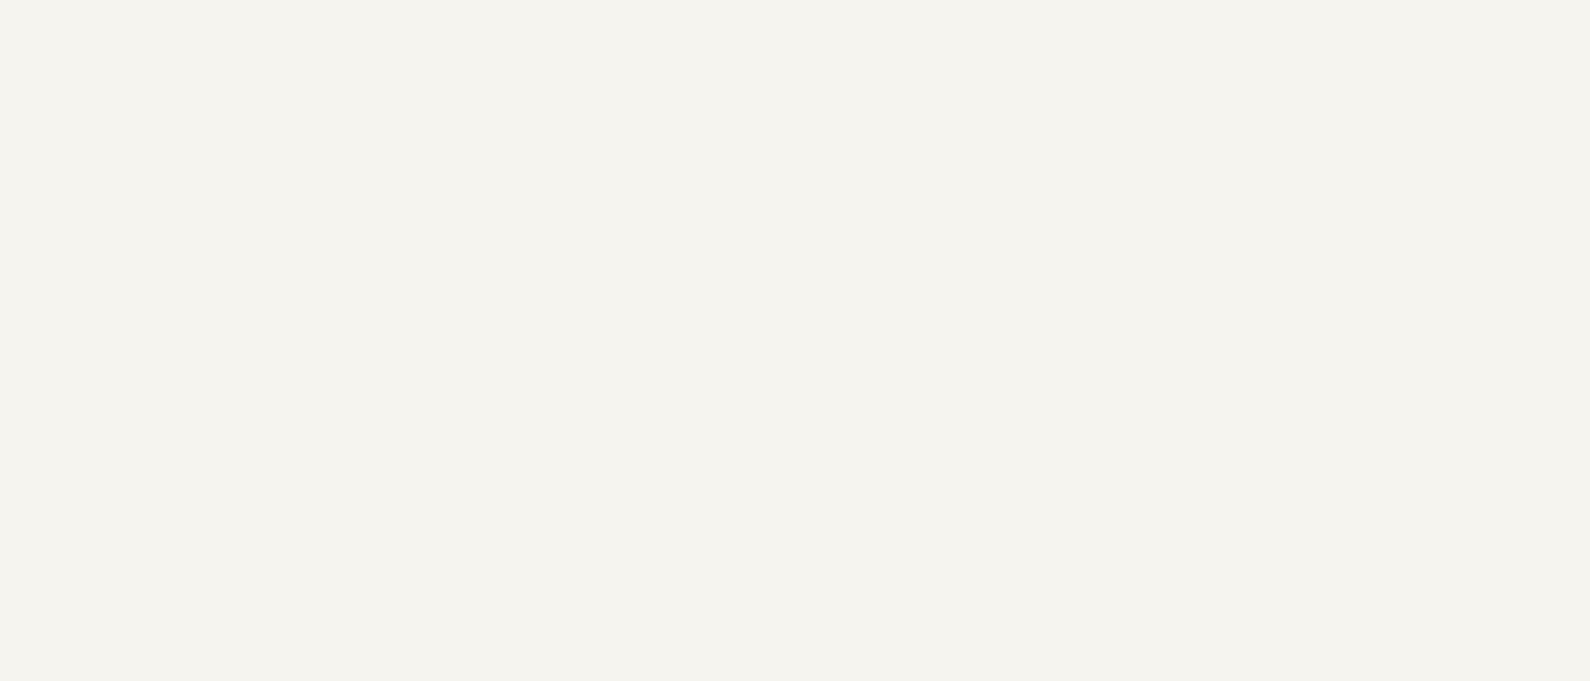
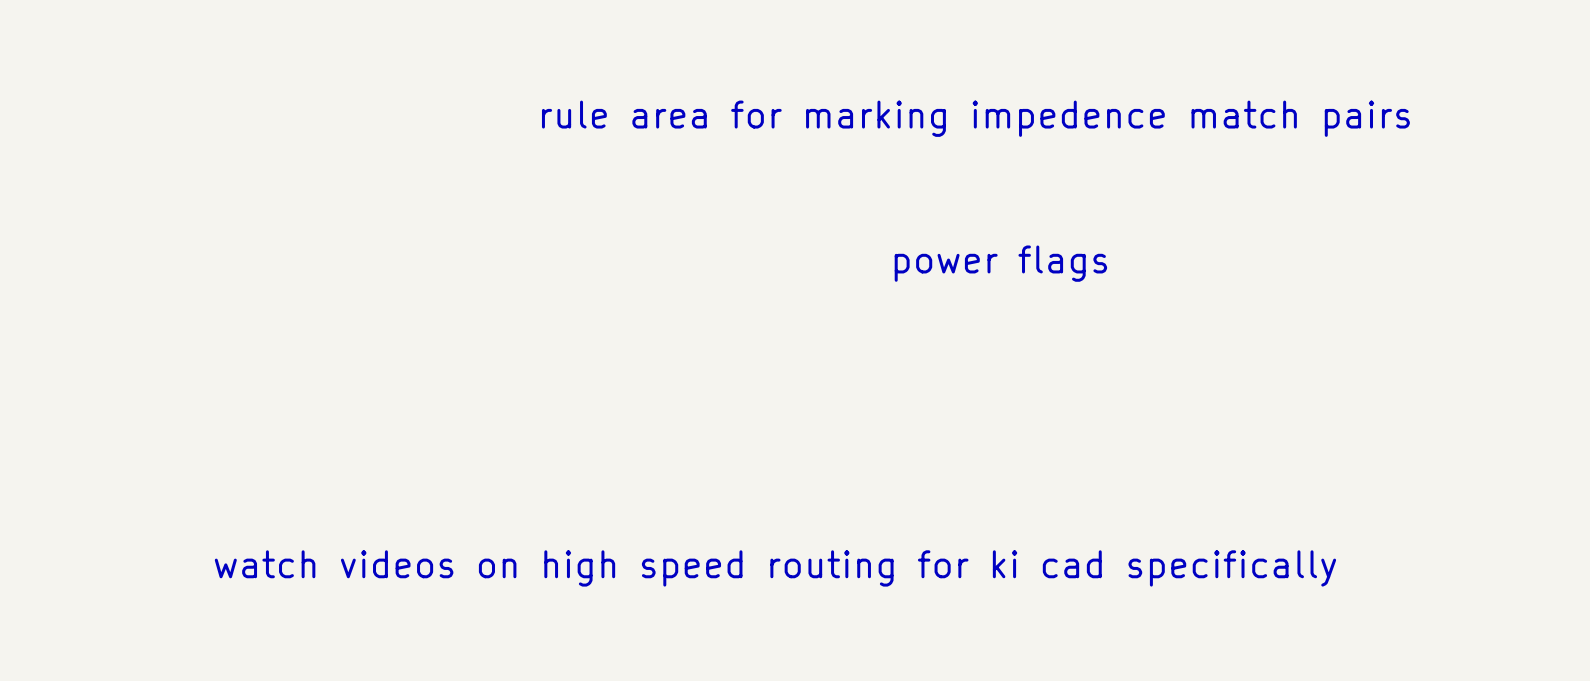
text: none -> rule area for marking impedence match pairs (975, 118)
text: none -> power flags (1000, 263)
text: none -> watch videos on high speed routing for ki cad specifically (775, 568)

